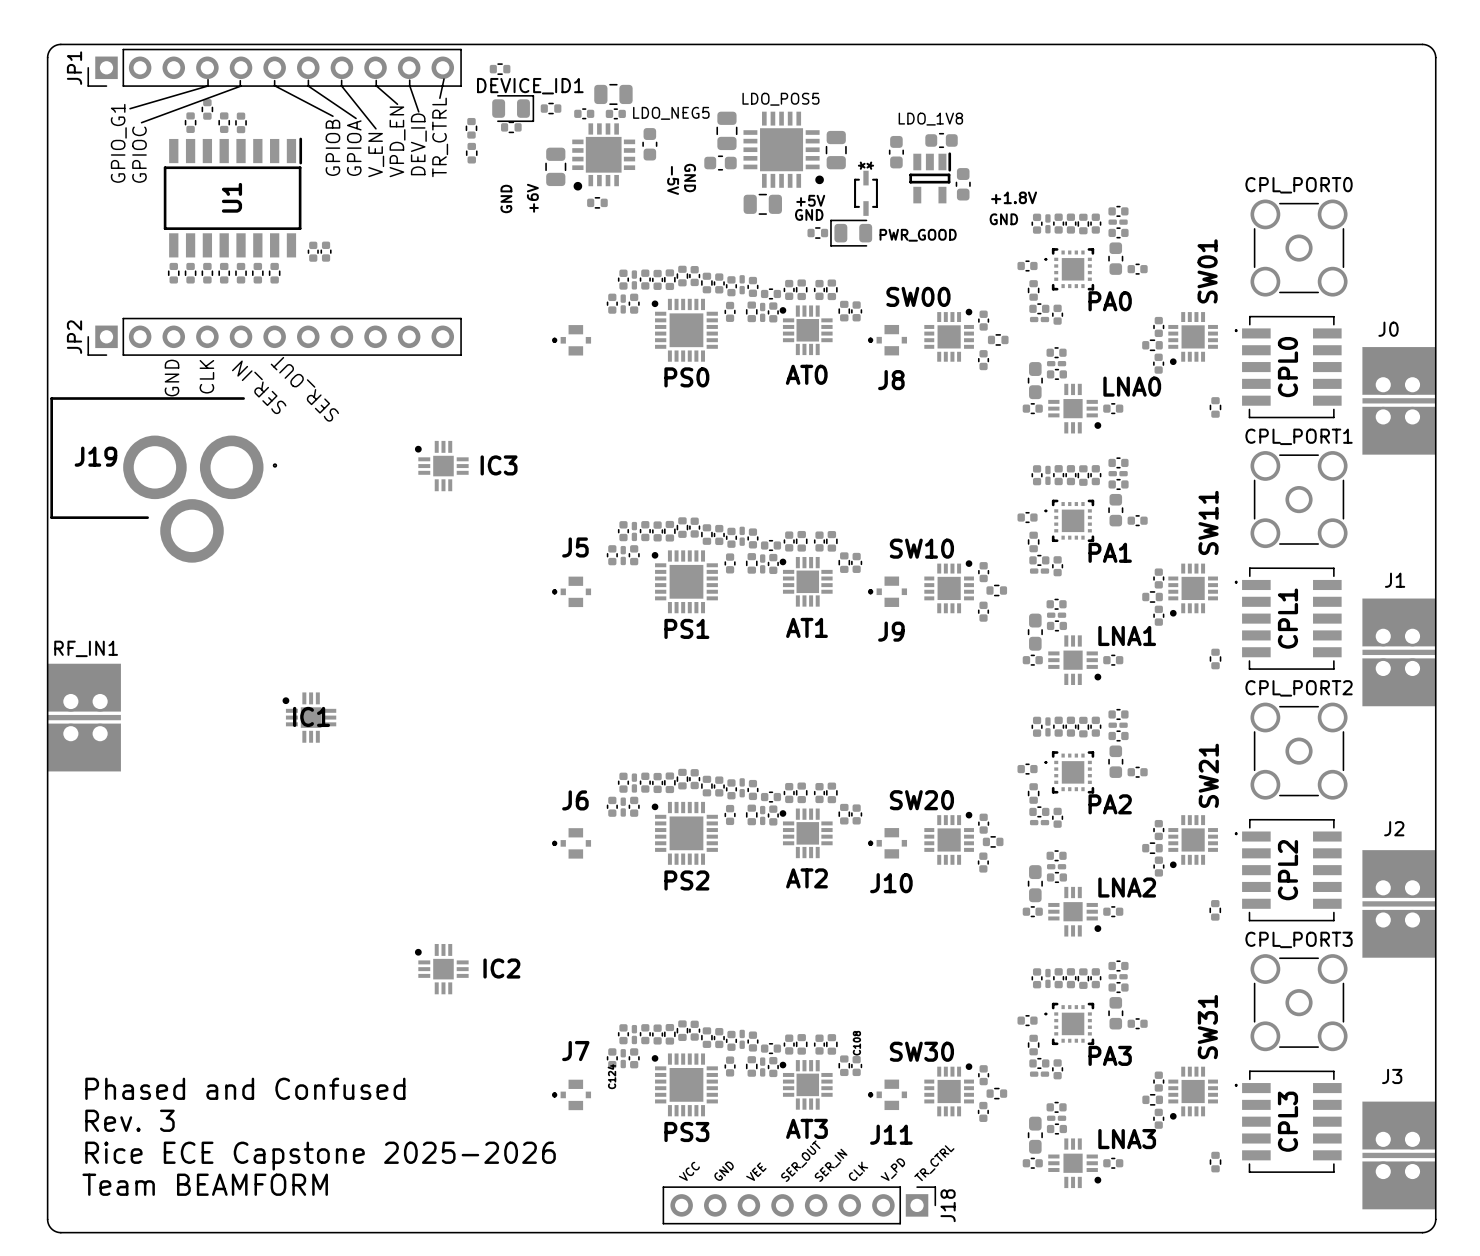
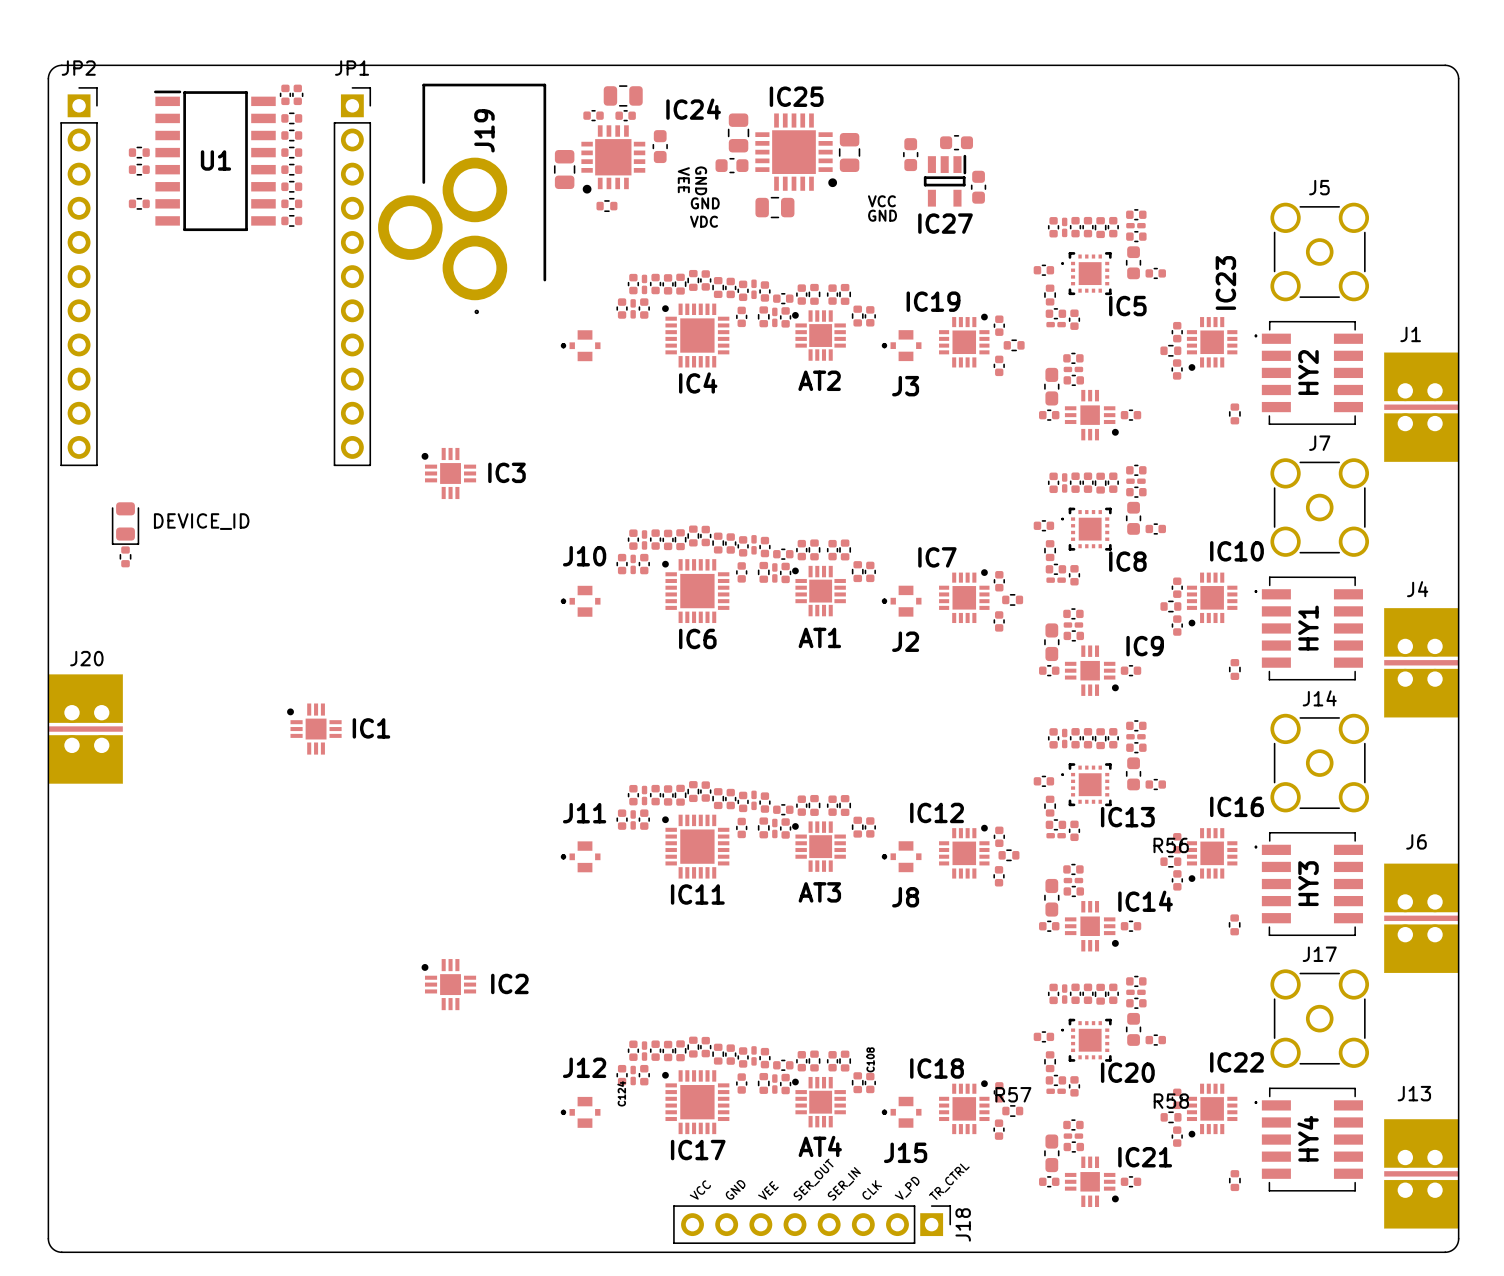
board edge: (60, 44) (1422, 44) (1429, 46) (1435, 53) (1435, 77) -> (48, 1238) (48, 78) (53, 68) (61, 65) (1445, 65) (1454, 69) (1458, 78)
board edge: (60, 44) (51, 48) (47, 57) (47, 1219) -> none
JP1 footprint: [87, 48, 462, 87] -> [333, 87, 372, 467]
JP1 name position: JP1 (74, 68) -> JP1 (352, 68)
part: (500, 69) -> none
line: (208, 79) (208, 85) (130, 108) -> none
line: (444, 79) (439, 98) -> none
line: (240, 80) (240, 86) -> none
line: (274, 80) (274, 85) (332, 116) -> none
line: (308, 80) (308, 86) (356, 118) -> none
line: (341, 80) (341, 86) (375, 128) -> none
line: (376, 80) (376, 85) (397, 104) -> none
line: (409, 80) (409, 85) (418, 111) -> none
line: (241, 85) (141, 122) -> none
part: none -> (285, 94)
part: none -> (297, 94)
LDO_POS5 name: LDO_POS5 (780, 99) -> IC25 (796, 96)
DEVICE_ID1: (513, 108) -> none
part: (551, 108) -> none
part: (207, 109) -> none
LDO_NEG5 name: LDO_NEG5 (671, 113) -> IC24 (693, 109)
part: none -> (291, 118)
LDO_1V8 name: LDO_1V8 (930, 119) -> IC27 (945, 223)
part: (190, 122) -> none
part: (224, 122) -> none
part: (241, 122) -> none
part: (511, 127) -> none
part: (471, 128) -> none
part: none -> (291, 135)
text: TR_CTRL (440, 137) -> none
text: VPD_EN (397, 141) -> none
text: GPIO_G1 (118, 143) -> none
text: DEV_ID (418, 144) -> none
text: GPIOB (332, 147) -> none
text: GPIOA (354, 148) -> none
part: none -> (139, 152)
part: none -> (291, 152)
part: (471, 153) -> none
text: GPIOC (139, 154) -> none
text: V_EN (376, 155) -> none
part: none -> (139, 169)
part: none -> (291, 169)
text: -5V (673, 180) -> VEE (683, 180)
part: none -> (291, 186)
CPL_PORT0 name: CPL_PORT0 (1299, 185) -> J5 (1319, 187)
part: (866, 193) -> none
U1 rotation: 0° (232, 197) -> 90° counterclockwise (214, 160)
text: +1.8V (1014, 197) -> none
text: GND (506, 198) -> none
text: +6V (532, 198) -> none
text: none -> VCC (881, 201)
part: none -> (139, 203)
part: none -> (291, 203)
text: none -> GND (705, 203)
text: +5V (810, 200) -> none
text: none -> GND (882, 215)
text: GND (809, 214) -> none
part: none -> (291, 220)
text: none -> VDC (704, 221)
text: GND (1003, 219) -> none
part: (817, 233) -> none
part: (851, 233) -> none
text: PWR_GOOD (918, 235) -> none
part: (313, 251) -> none
part: (326, 251) -> none
SW01 name: SW01 (1207, 271) -> IC23 (1225, 282)
part: (173, 273) -> none
part: (190, 273) -> none
part: (207, 273) -> none
part: (224, 273) -> none
part: (241, 273) -> none
part: (257, 273) -> none
part: (274, 273) -> none
SW00 name: SW00 (918, 296) -> IC19 (933, 301)
PA0 name: PA0 (1110, 301) -> IC5 (1127, 306)
JP2 footprint: [87, 317, 462, 356] -> [60, 87, 98, 467]
J0 name: J0 (1388, 329) -> J1 (1410, 334)
JP2 name position: JP2 (74, 337) -> JP2 (78, 68)
CPL0 name: CPL0 (1287, 367) -> HY2 (1308, 372)
AT0 name: AT0 (806, 374) -> AT2 (819, 380)
text: CLK (206, 376) -> none
PS0 name: PS0 (686, 377) -> IC4 (698, 382)
text: GND (172, 378) -> none
J8 name: J8 (891, 380) -> J3 (905, 386)
LNA0 name: LNA0 (1132, 386) -> none
text: SER_IN (259, 387) -> none
text: SER_OUT (304, 389) -> none
CPL_PORT1 name: CPL_PORT1 (1299, 436) -> J7 (1319, 443)
J19 rotation: 0° (163, 479) -> 90° clockwise (462, 198)
J19 position: (163, 479) -> (462, 198)
DEVICE_ID: none -> (125, 523)
SW11 name: SW11 (1208, 522) -> IC10 (1236, 551)
J5 name: J5 (575, 547) -> J10 (584, 556)
part: none -> (125, 556)
SW10 name: SW10 (921, 548) -> IC7 (937, 557)
PA1 name: PA1 (1110, 552) -> IC8 (1127, 561)
J1 name: J1 (1395, 580) -> J4 (1417, 589)
CPL1 name: CPL1 (1287, 618) -> HY1 (1308, 628)
PS1 name: PS1 (686, 628) -> IC6 (697, 638)
J9 name: J9 (891, 631) -> J2 (905, 641)
LNA1 name: LNA1 (1127, 635) -> IC9 (1145, 646)
RF_IN1 name: RF_IN1 (86, 648) -> J20 (86, 658)
CPL_PORT2 name: CPL_PORT2 (1299, 688) -> J14 (1319, 698)
IC1 name position: IC1 (311, 716) -> IC1 (371, 728)
SW21 name: SW21 (1208, 775) -> IC16 (1236, 806)
J6 name: J6 (575, 800) -> J11 (584, 813)
SW20 name: SW20 (921, 800) -> IC12 (937, 812)
PA2 name: PA2 (1110, 804) -> IC13 (1127, 817)
J2 name: J2 (1394, 828) -> J6 (1416, 841)
R56 name: none -> R56 (1171, 845)
CPL2 name: CPL2 (1287, 870) -> HY3 (1308, 883)
AT2 name: AT2 (806, 878) -> AT3 (819, 892)
PS2 name: PS2 (686, 880) -> IC11 (697, 894)
J10 name: J10 (891, 883) -> J8 (905, 897)
LNA2 name: LNA2 (1127, 887) -> IC14 (1145, 901)
CPL_PORT3 name: CPL_PORT3 (1299, 939) -> J17 (1319, 954)
SW31 name: SW31 (1207, 1027) -> IC22 (1236, 1062)
J7 name: J7 (575, 1051) -> J12 (584, 1067)
SW30 name: SW30 (921, 1051) -> IC18 (937, 1068)
PA3 name: PA3 (1110, 1055) -> IC20 (1127, 1072)
J3 name: J3 (1392, 1076) -> J13 (1414, 1093)
R57 name: none -> R57 (1013, 1094)
R58 name: none -> R58 (1171, 1101)
text: Phased and Confused (245, 1088) -> none
text: Rev. 3 (129, 1120) -> none
CPL3 name: CPL3 (1287, 1121) -> HY4 (1308, 1138)
AT3 name: AT3 (806, 1128) -> AT4 (820, 1146)
PS3 name: PS3 (686, 1132) -> IC17 (698, 1150)
J11 name: J11 (891, 1134) -> J15 (905, 1152)
LNA3 name: LNA3 (1127, 1139) -> IC21 (1145, 1157)
text: Rice ECE Capstone 2025-2026 (320, 1156) -> none
text: Team BEAMFORM (205, 1184) -> none

